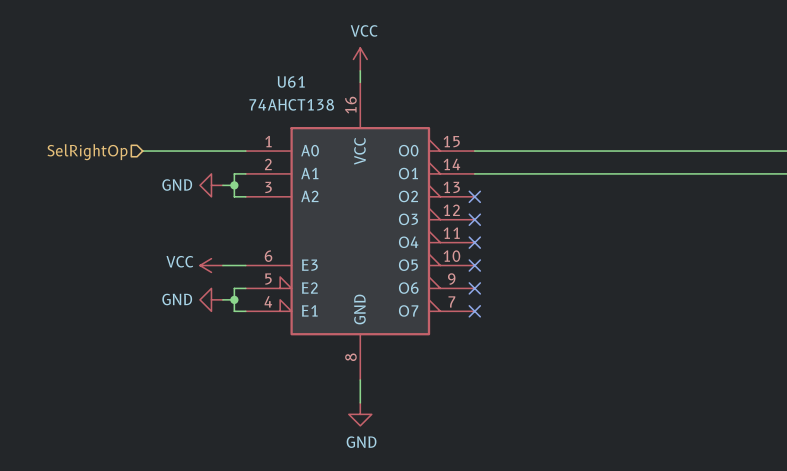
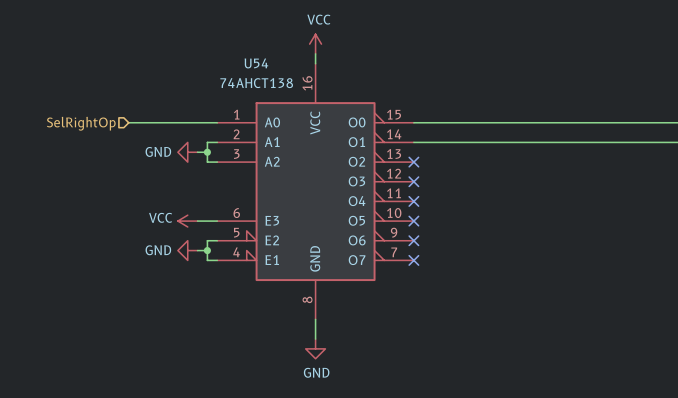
U61 name: U61 (291, 81) -> U54 (256, 63)

